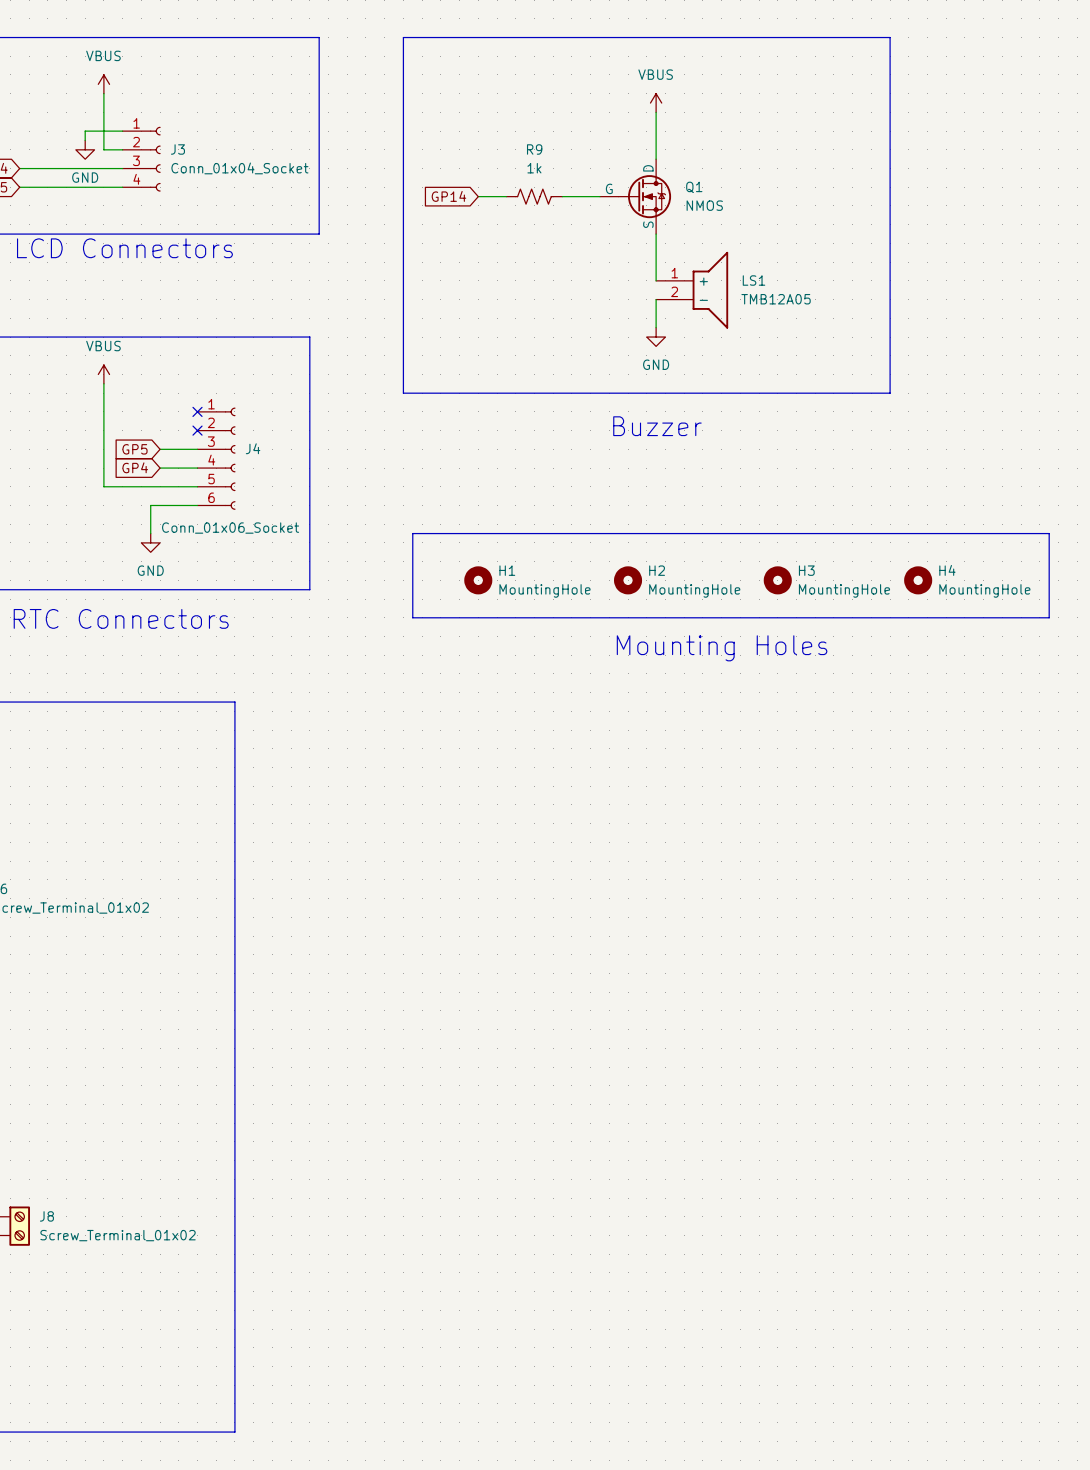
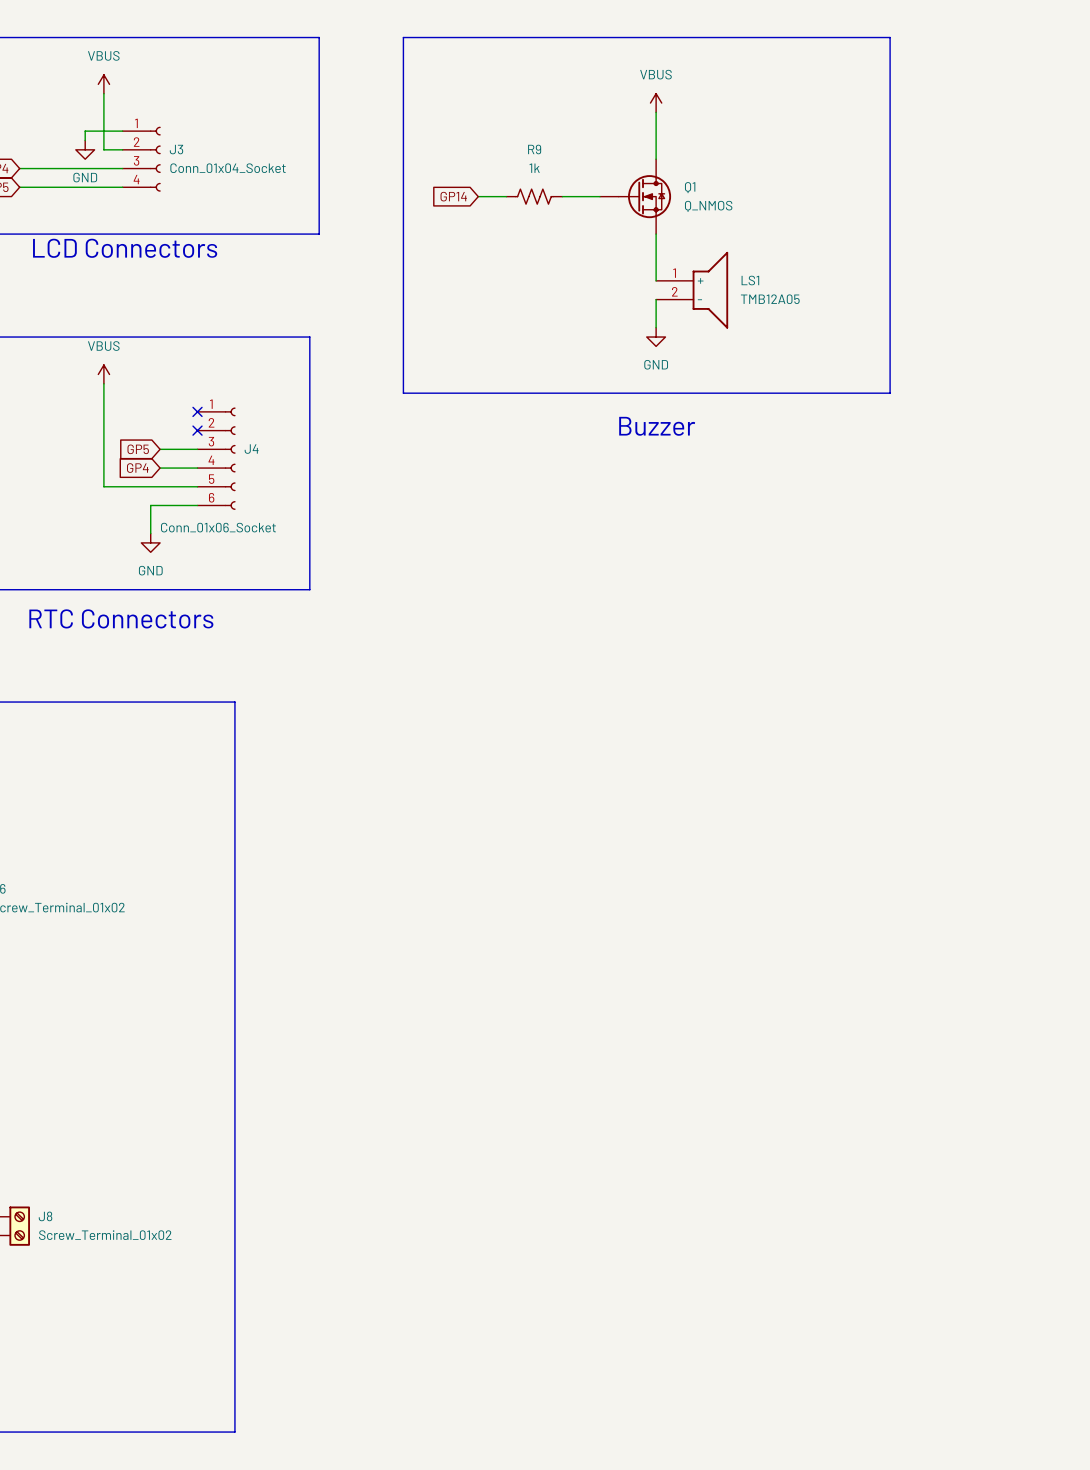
Q1 symbol: [599, 159, 672, 235] -> [599, 159, 672, 235]
Q1 value: NMOS (704, 205) -> Q_NMOS (708, 206)
line: (412, 533) (1049, 533) (1049, 617) (412, 617) (412, 533) -> none
H1: MountingHole (478, 580) -> none
H2: MountingHole (628, 580) -> none
H3: MountingHole (777, 580) -> none
H4: MountingHole (918, 580) -> none
text: Mounting Holes (722, 648) -> none

